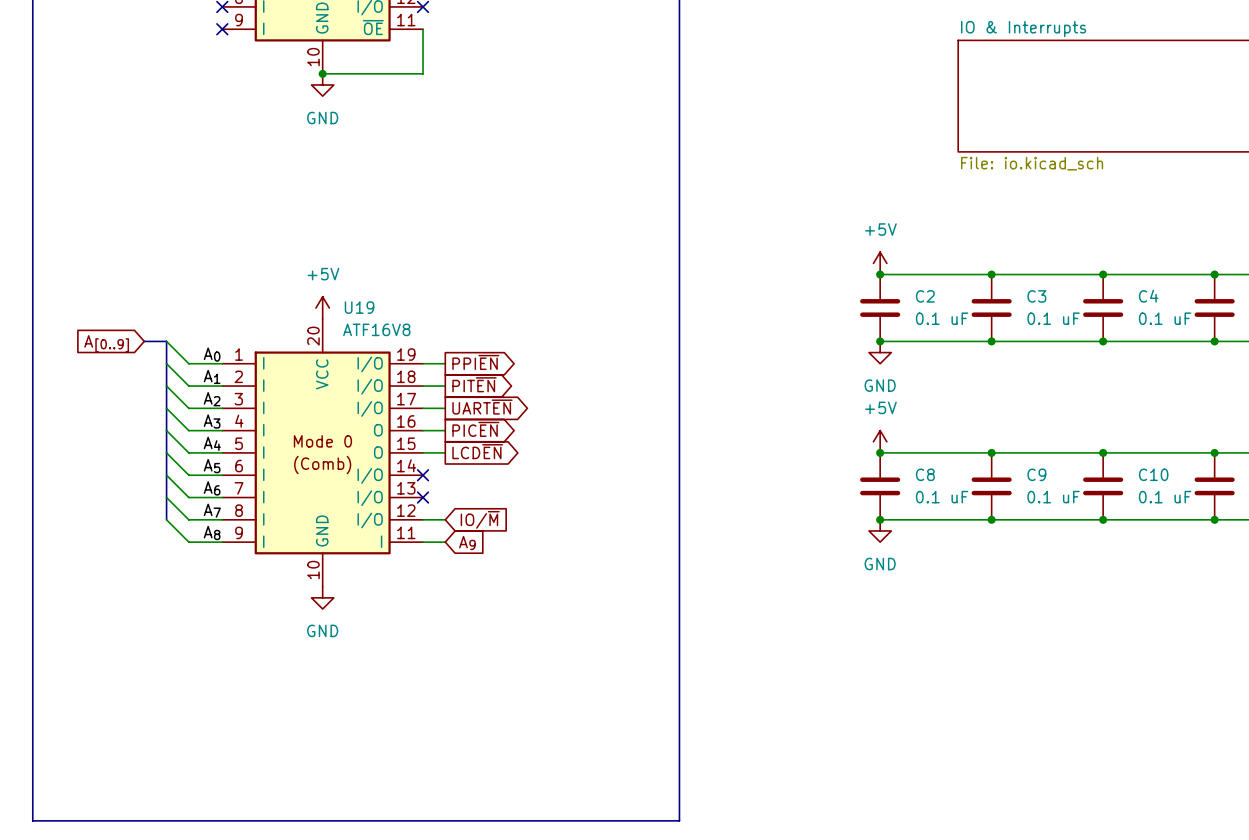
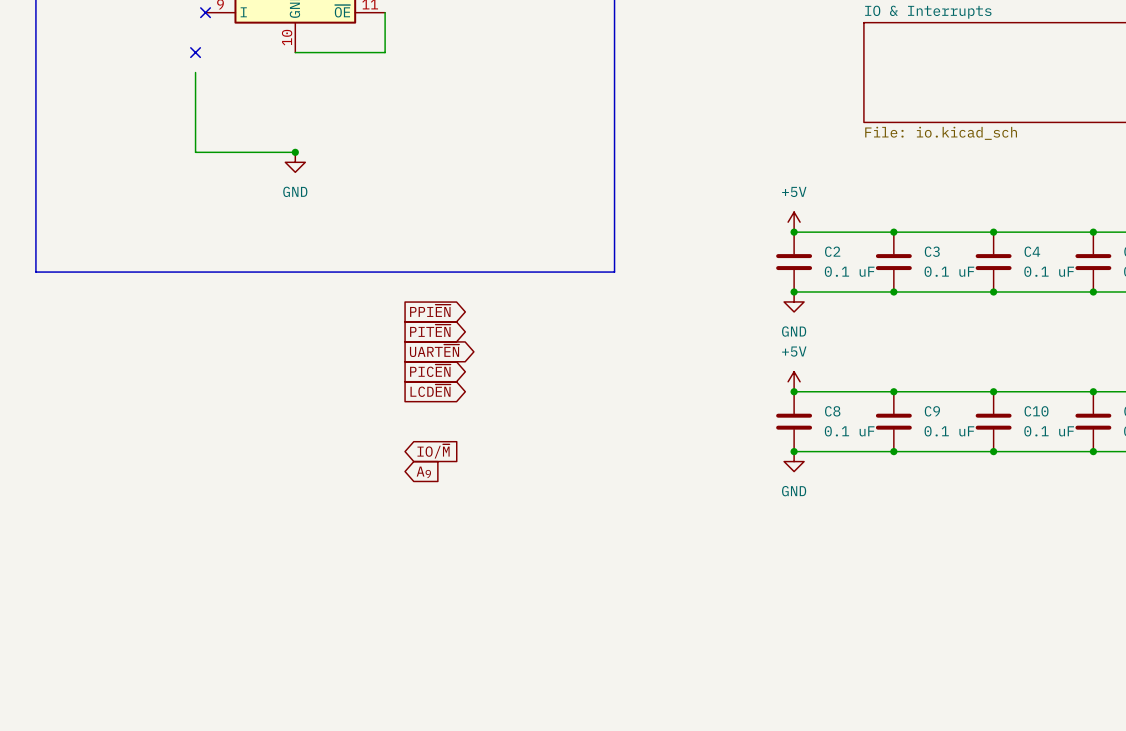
no-connect mark: none -> (195, 52)
junction: (322, 73) -> none
power symbol position: GND (322, 84) -> GND (295, 162)
wire: none -> (195, 72) (195, 152) (295, 152)
junction: none -> (295, 152)
power symbol: +5V (322, 307) -> none
line: (32, 319) (32, 820) (679, 820) (679, 319) -> (35, 272) (614, 272)
bus: (144, 341) (166, 341) (166, 519) -> none
wire: (166, 341) (188, 363) (222, 363) -> none
global label: A[0..9] (106, 343) -> none
label: A0 (212, 354) -> none
wire: (166, 363) (188, 386) (222, 386) -> none
wire: (423, 363) (445, 363) -> none
label: A1 (212, 376) -> none
wire: (166, 386) (188, 408) (222, 408) -> none
wire: (423, 386) (445, 386) -> none
label: A2 (212, 399) -> none
wire: (166, 408) (188, 430) (222, 430) -> none
wire: (423, 408) (445, 408) -> none
label: A3 (212, 421) -> none
wire: (166, 430) (188, 452) (222, 452) -> none
wire: (423, 430) (445, 430) -> none
label: A4 (212, 443) -> none
wire: (166, 452) (188, 475) (222, 475) -> none
U19: ATF16V8 (322, 452) -> none
wire: (423, 452) (445, 452) -> none
label: A5 (212, 466) -> none
wire: (166, 475) (188, 497) (222, 497) -> none
no-connect mark: (423, 475) -> none
label: A6 (212, 488) -> none
wire: (166, 497) (188, 519) (222, 519) -> none
no-connect mark: (423, 497) -> none
label: A7 (212, 510) -> none
wire: (166, 519) (188, 542) (222, 542) -> none
wire: (423, 519) (445, 519) -> none
label: A8 (212, 533) -> none
wire: (423, 542) (445, 542) -> none
power symbol: GND (322, 597) -> none

